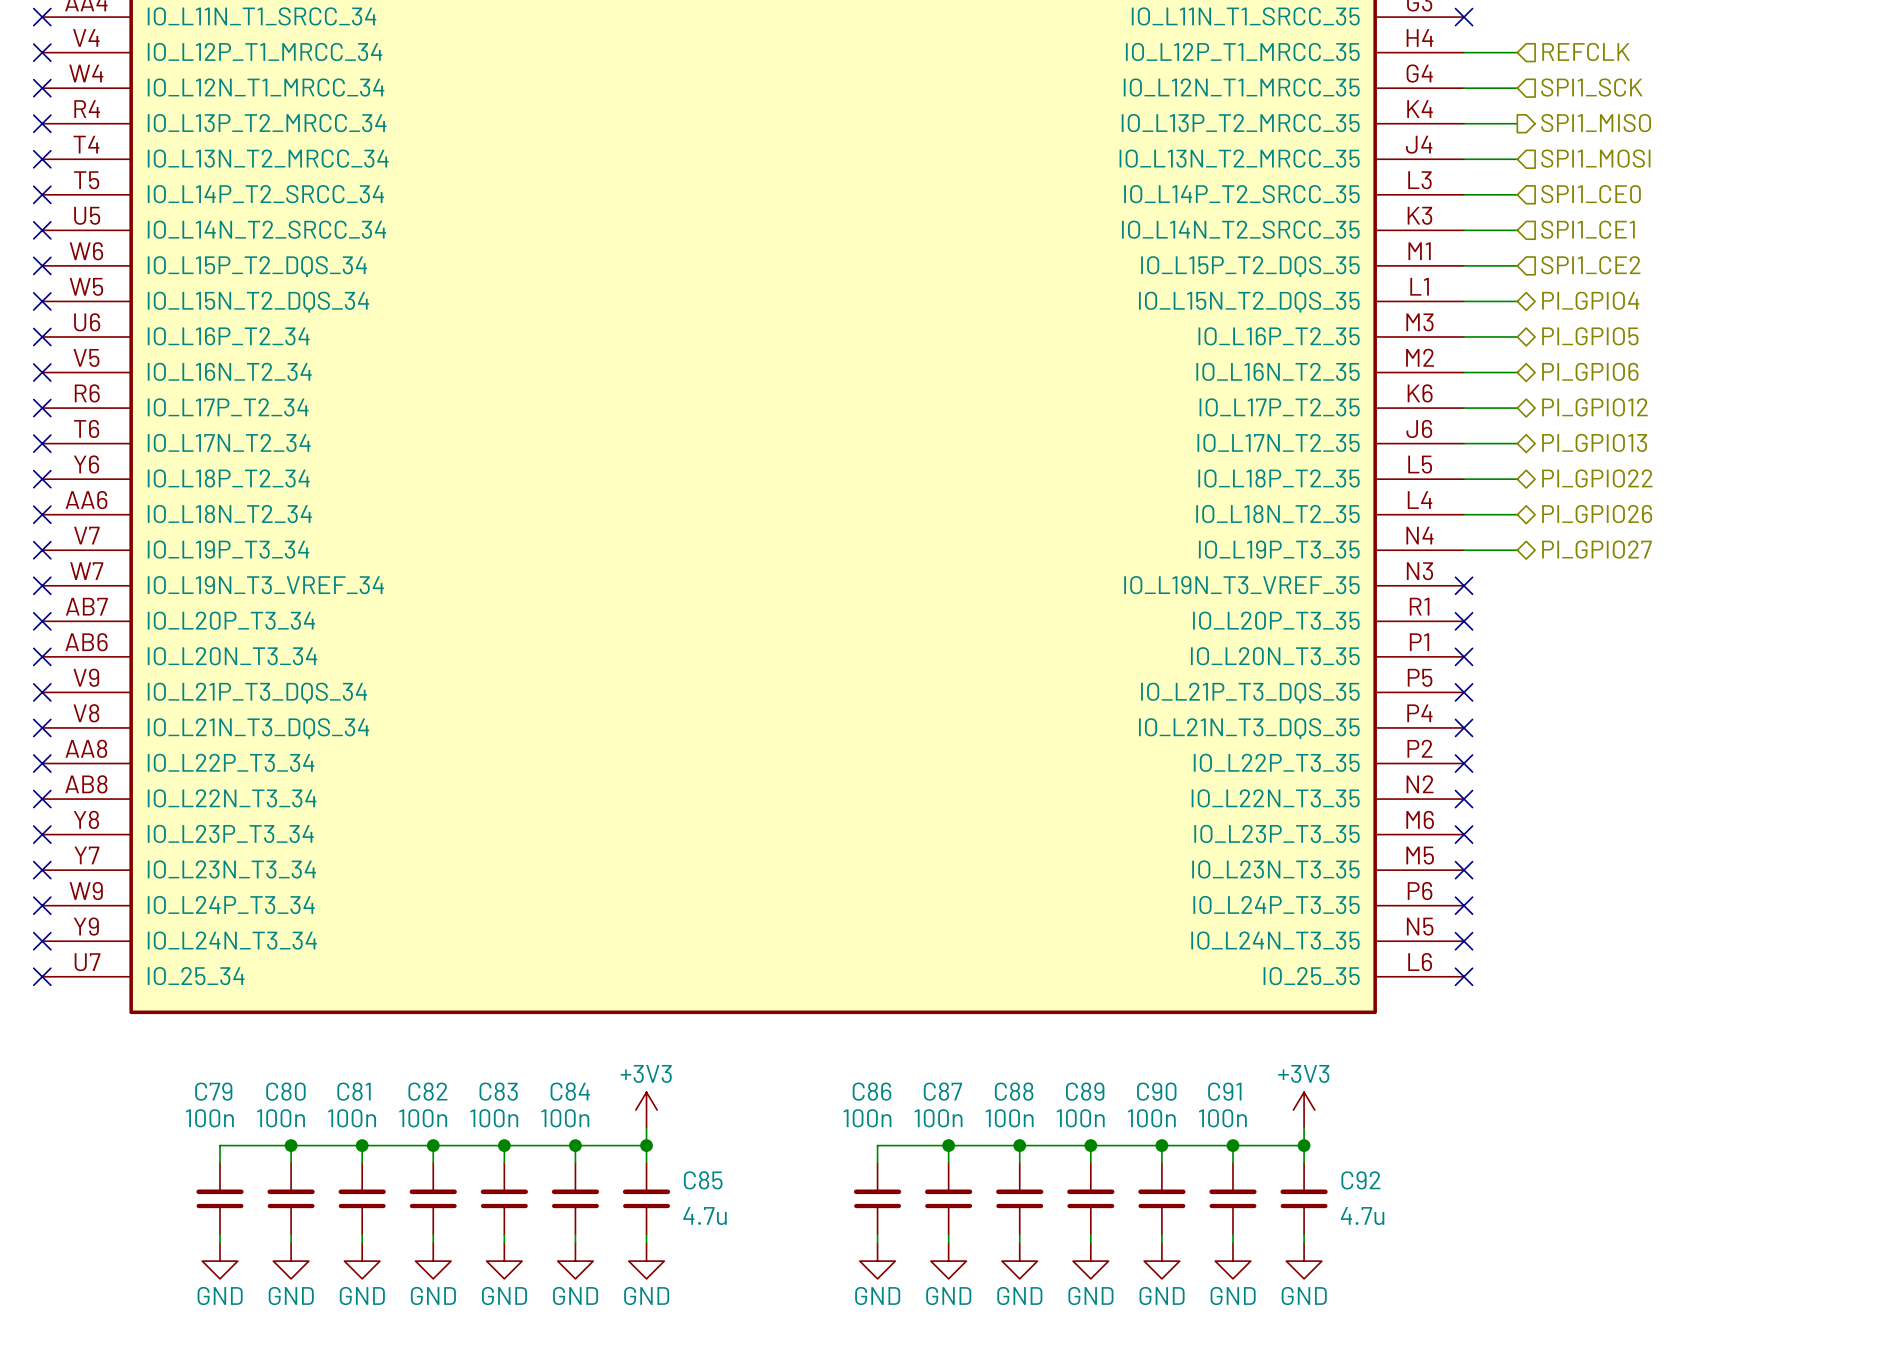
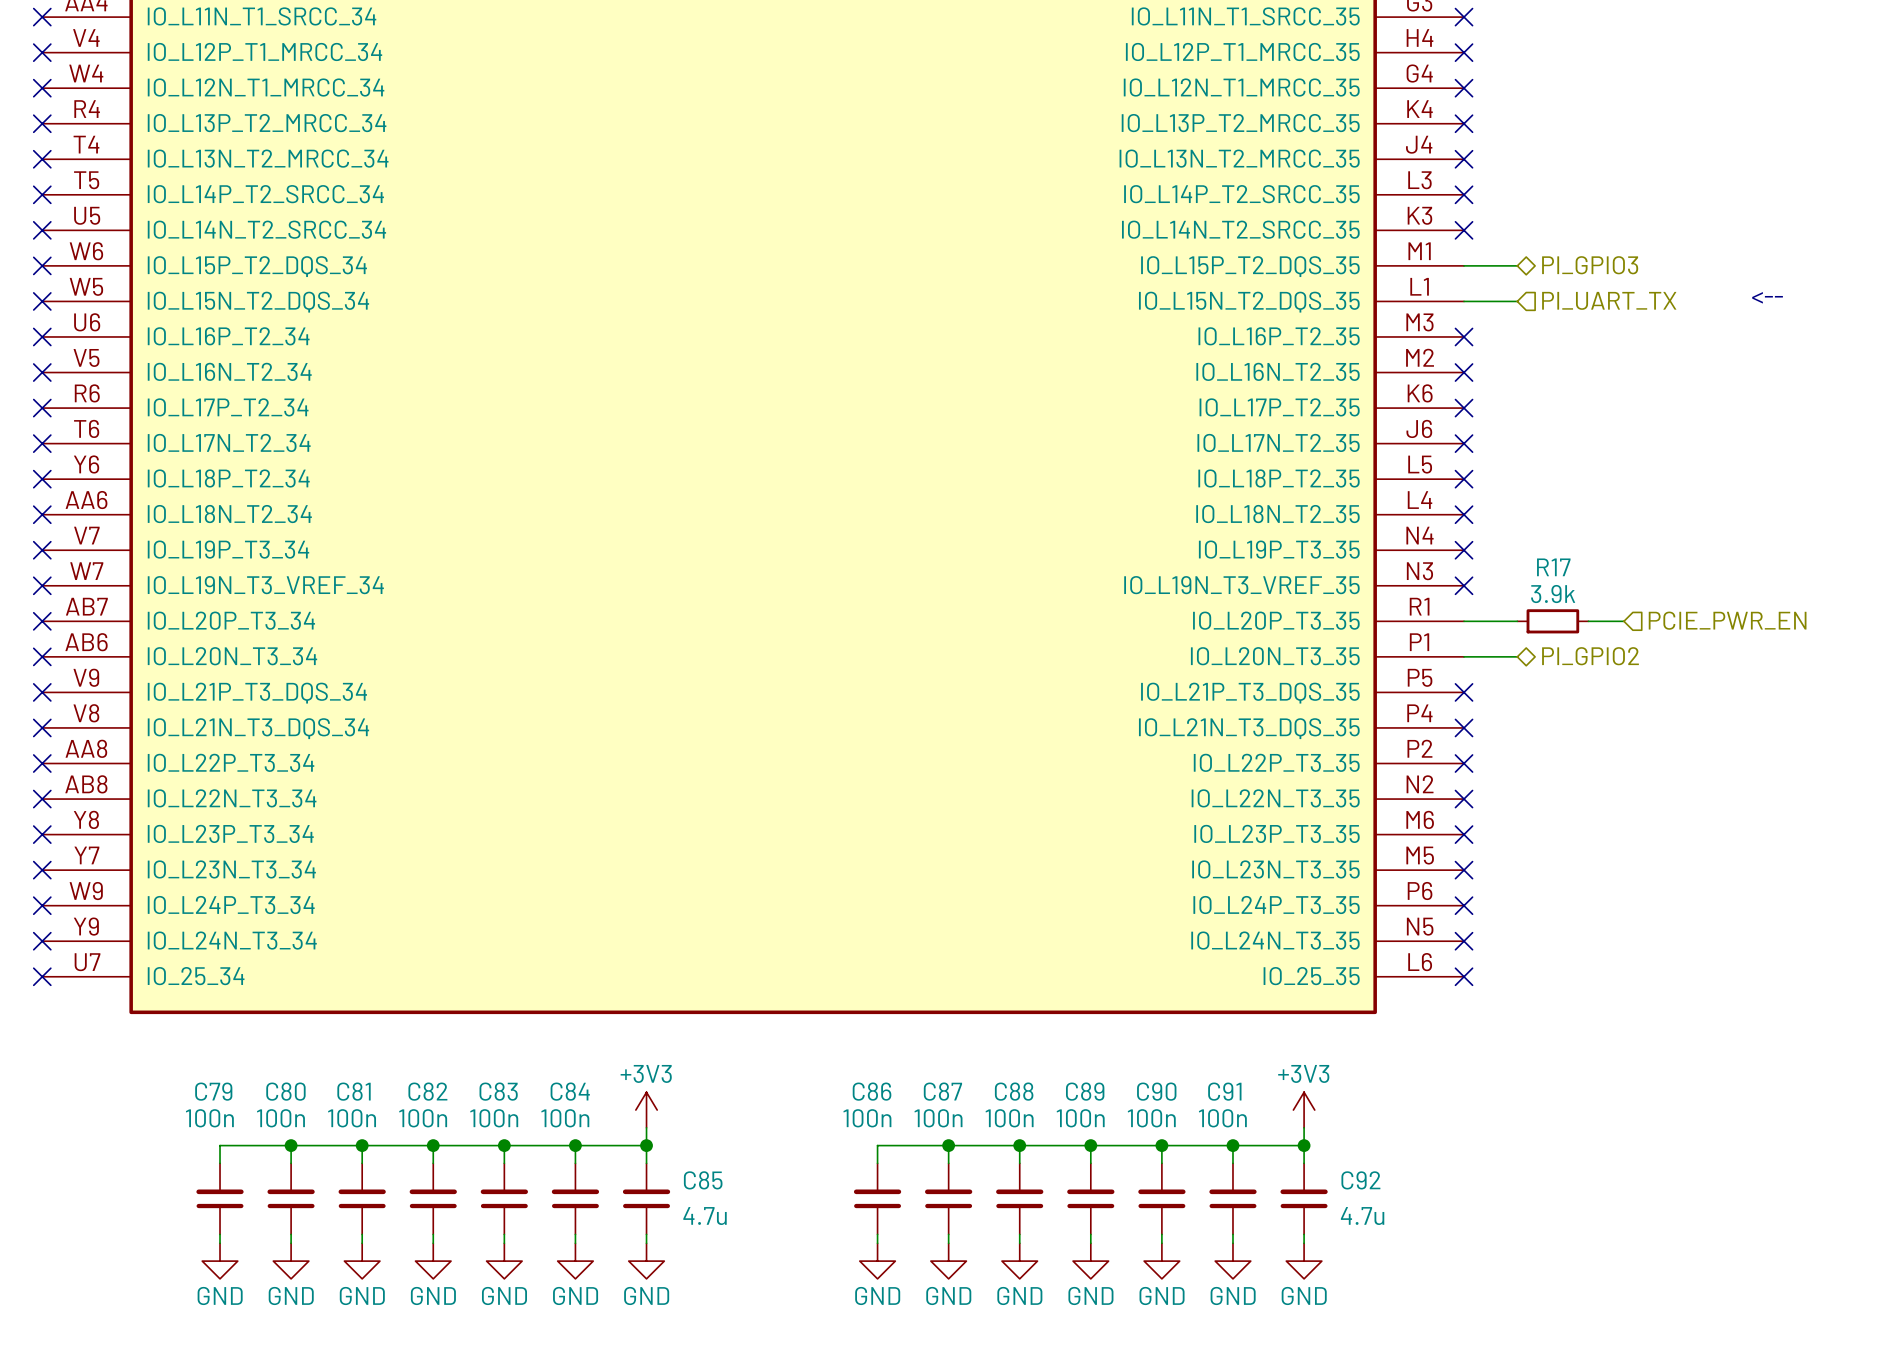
hierarchical label: REFCLK (1586, 51) -> none
wire: (1464, 52) (1517, 52) -> none
no-connect mark: none -> (1464, 52)
hierarchical label: SPI1_SCK (1591, 87) -> none
wire: (1464, 88) (1517, 88) -> none
no-connect mark: none -> (1464, 88)
wire: (1464, 123) (1517, 123) -> none
no-connect mark: none -> (1464, 123)
hierarchical label: SPI1_MISO (1596, 123) -> none
hierarchical label: SPI1_MOSI (1595, 158) -> none
wire: (1464, 159) (1517, 159) -> none
no-connect mark: none -> (1464, 159)
wire: (1464, 194) (1517, 194) -> none
no-connect mark: none -> (1464, 194)
hierarchical label: SPI1_CE0 (1591, 194) -> none
hierarchical label: SPI1_CE1 (1588, 229) -> none
wire: (1464, 230) (1517, 230) -> none
no-connect mark: none -> (1464, 230)
hierarchical label shape: input (1590, 265) -> bidirectional (1590, 265)
hierarchical label: SPI1_CE2 (1590, 265) -> PI_GPIO3 (1590, 265)
text: none -> <-- (1767, 297)
hierarchical label shape: bidirectional (1590, 300) -> input (1609, 300)
hierarchical label: PI_GPIO4 (1590, 300) -> PI_UART_TX (1609, 300)
wire: (1464, 336) (1517, 336) -> none
no-connect mark: none -> (1464, 336)
hierarchical label: PI_GPIO5 (1590, 336) -> none
hierarchical label: PI_GPIO6 (1590, 371) -> none
wire: (1464, 372) (1517, 372) -> none
no-connect mark: none -> (1464, 372)
hierarchical label: PI_GPIO12 (1594, 407) -> none
wire: (1464, 408) (1517, 408) -> none
no-connect mark: none -> (1464, 408)
hierarchical label: PI_GPIO13 (1594, 442) -> none
wire: (1464, 443) (1517, 443) -> none
no-connect mark: none -> (1464, 443)
hierarchical label: PI_GPIO22 (1597, 478) -> none
wire: (1464, 479) (1517, 479) -> none
no-connect mark: none -> (1464, 479)
wire: (1464, 514) (1517, 514) -> (1464, 621) (1517, 621)
no-connect mark: none -> (1464, 514)
hierarchical label: PI_GPIO26 (1597, 514) -> none
hierarchical label: PI_GPIO27 (1596, 549) -> none
wire: (1464, 550) (1517, 550) -> (1464, 656) (1517, 656)
no-connect mark: none -> (1464, 550)
hierarchical label: none -> PCIE_PWR_EN (1727, 620)
no-connect mark: (1464, 621) -> none
R17: none -> 3.9k (1552, 621)
wire: none -> (1588, 621) (1623, 621)
no-connect mark: (1464, 656) -> none
hierarchical label: none -> PI_GPIO2 (1590, 656)

